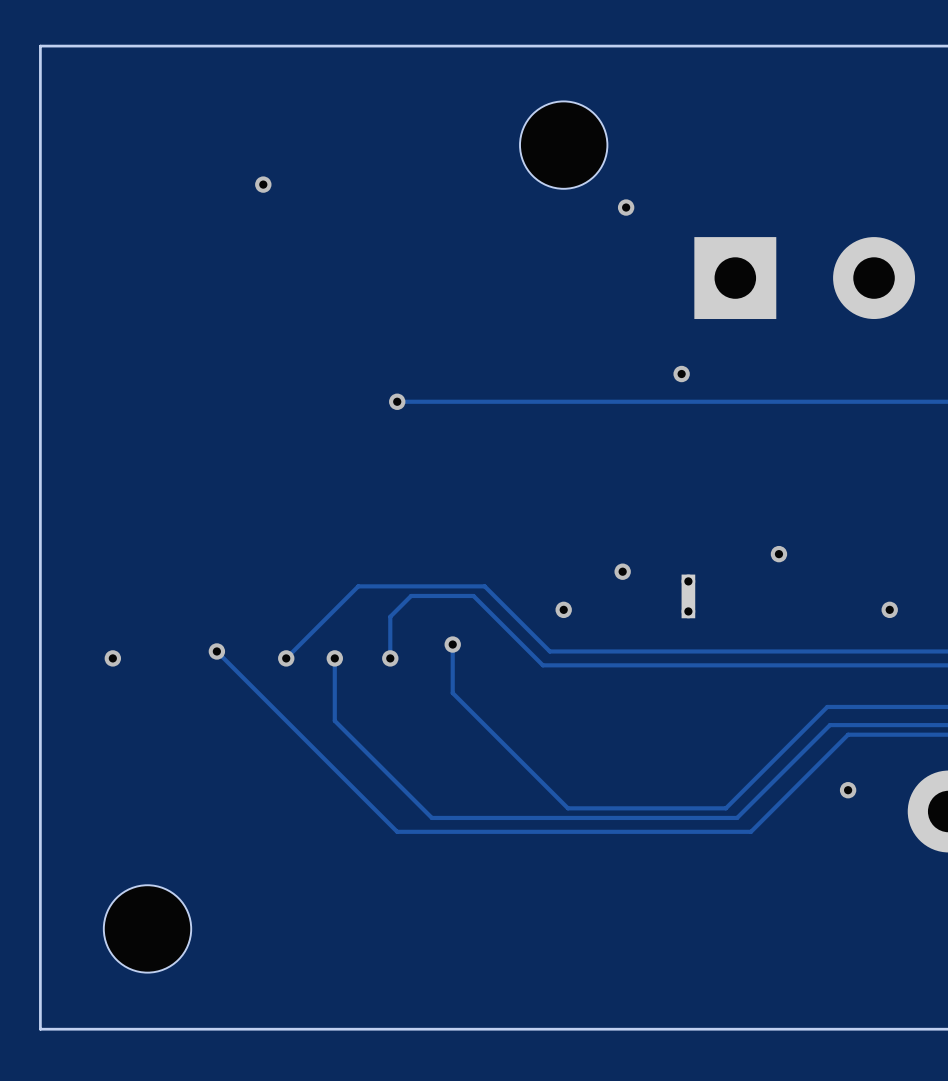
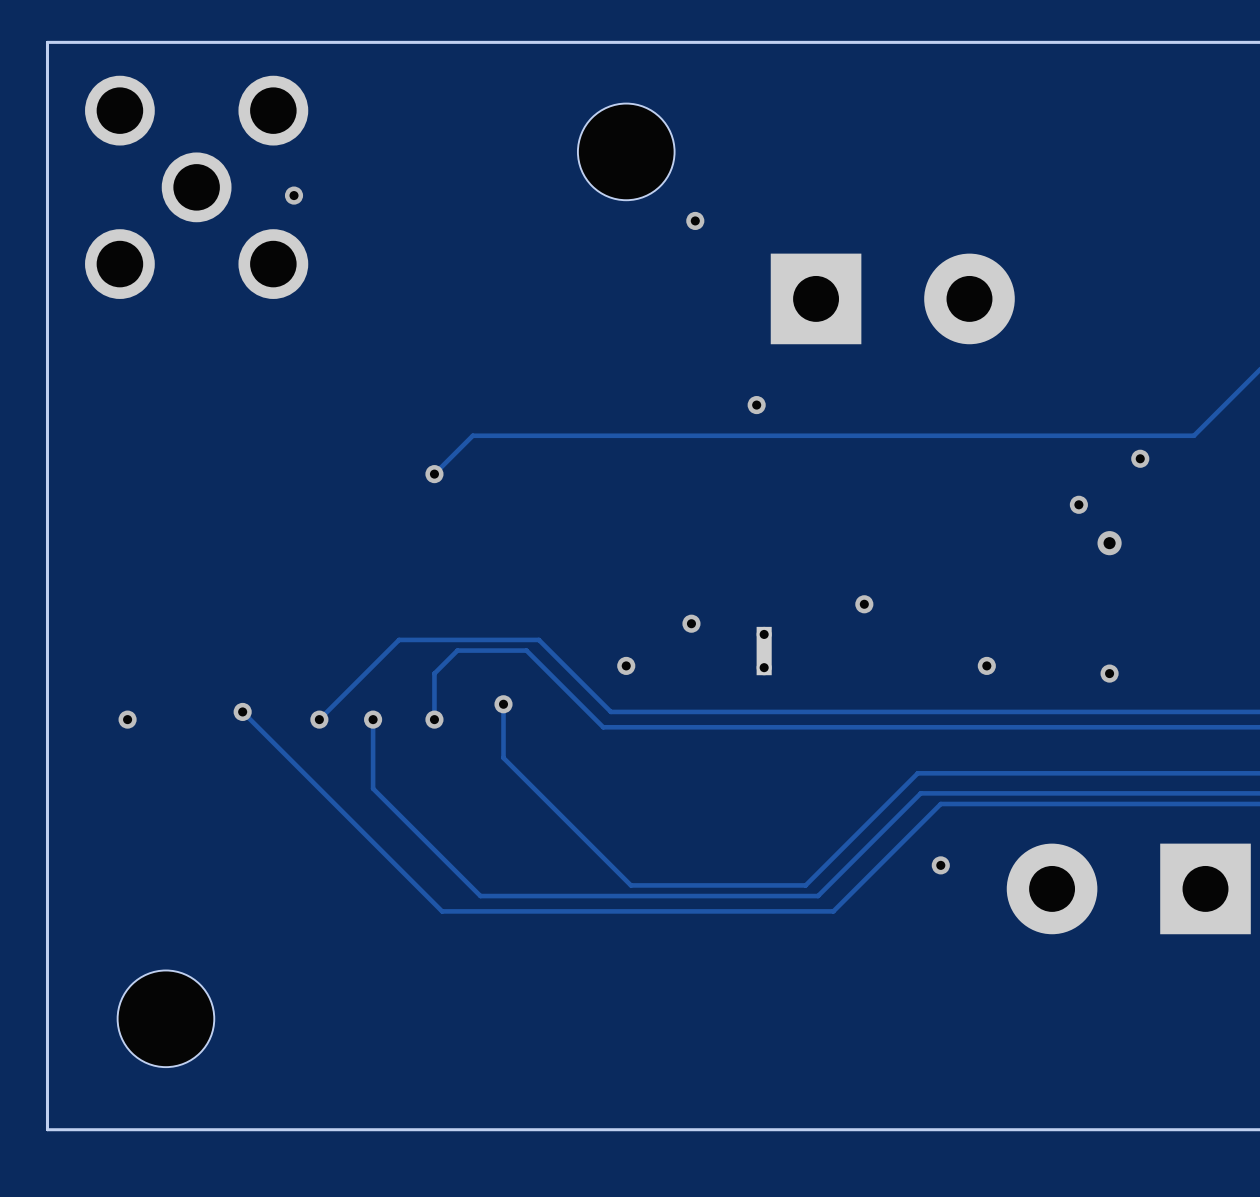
part: none -> (196, 187)
via position: (397, 401) -> (434, 474)
track: (424, 401) (397, 401) -> (472, 435) (434, 474)

